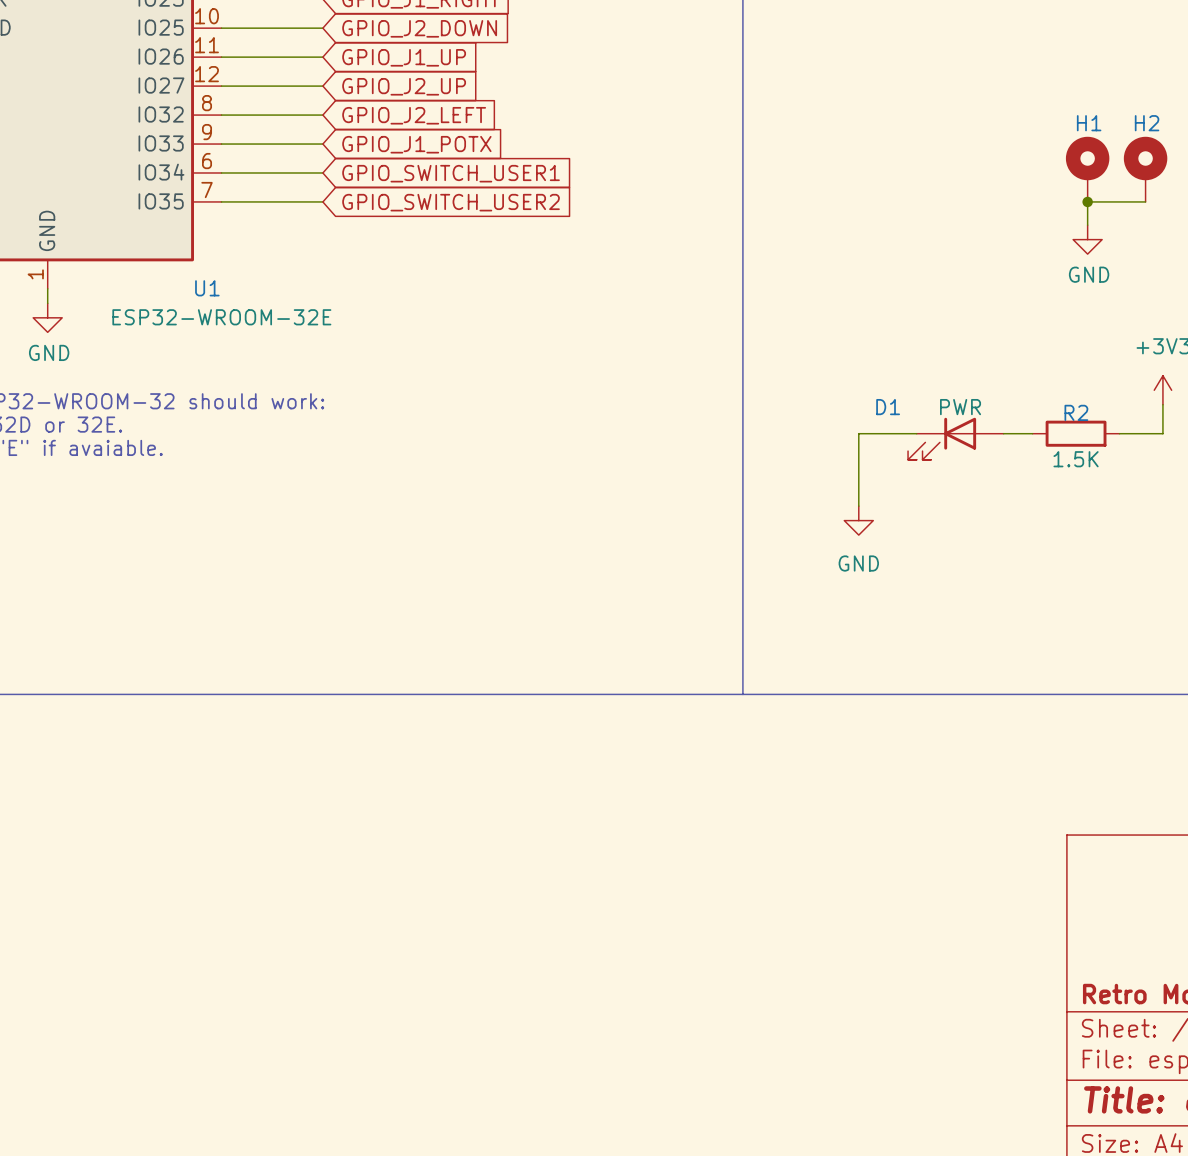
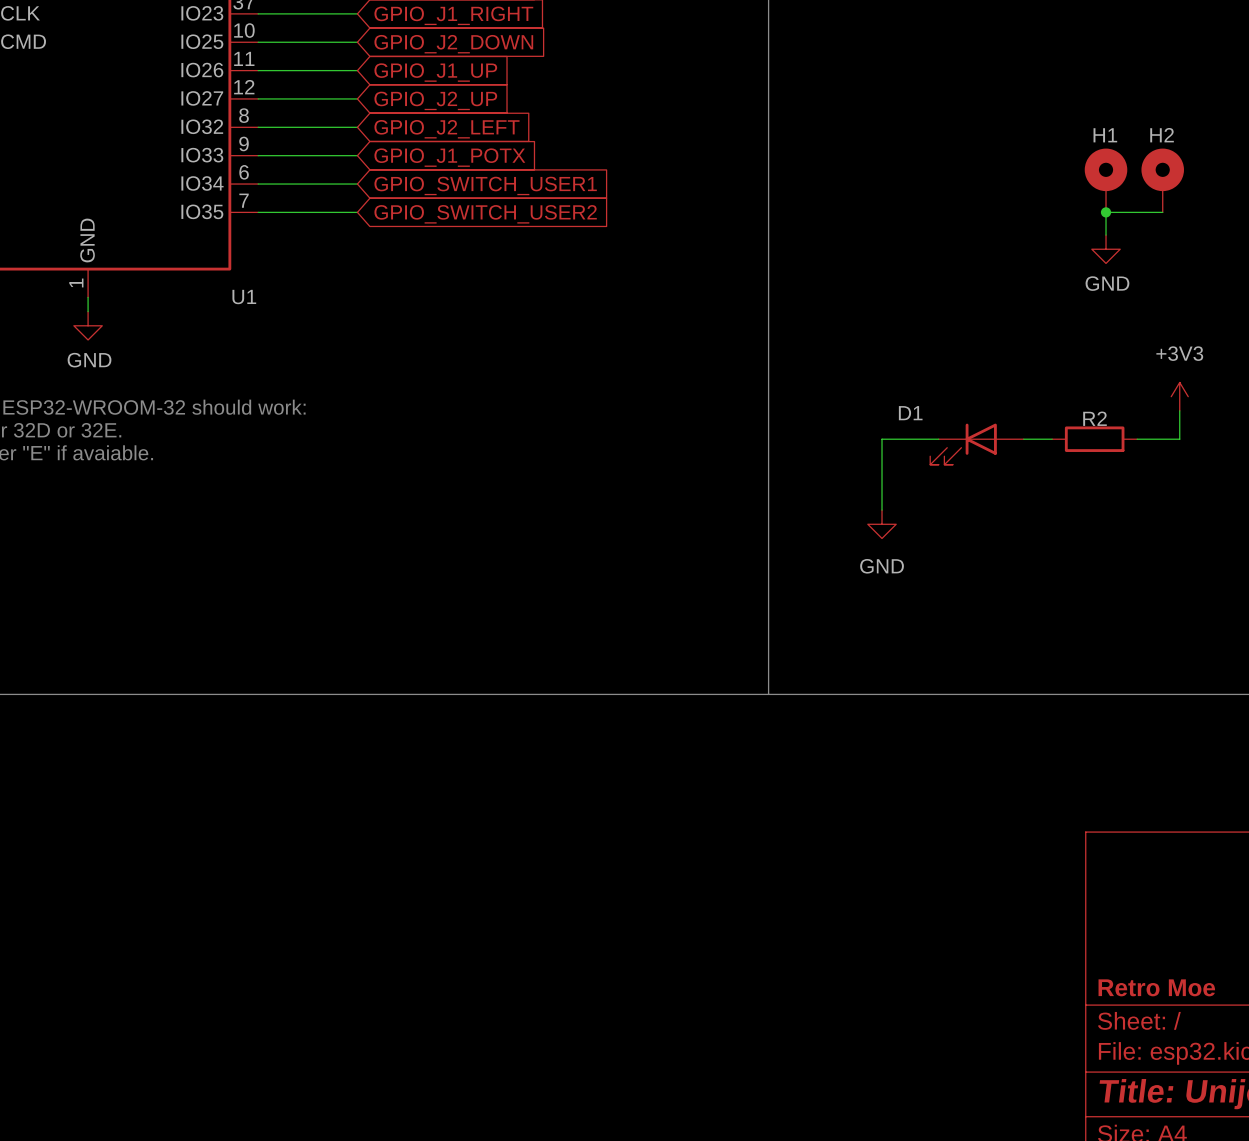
U1 value: ESP32-WROOM-32E (221, 317) -> none
D1 value: PWR (960, 407) -> none
R2 value: 1.5K (1076, 459) -> none

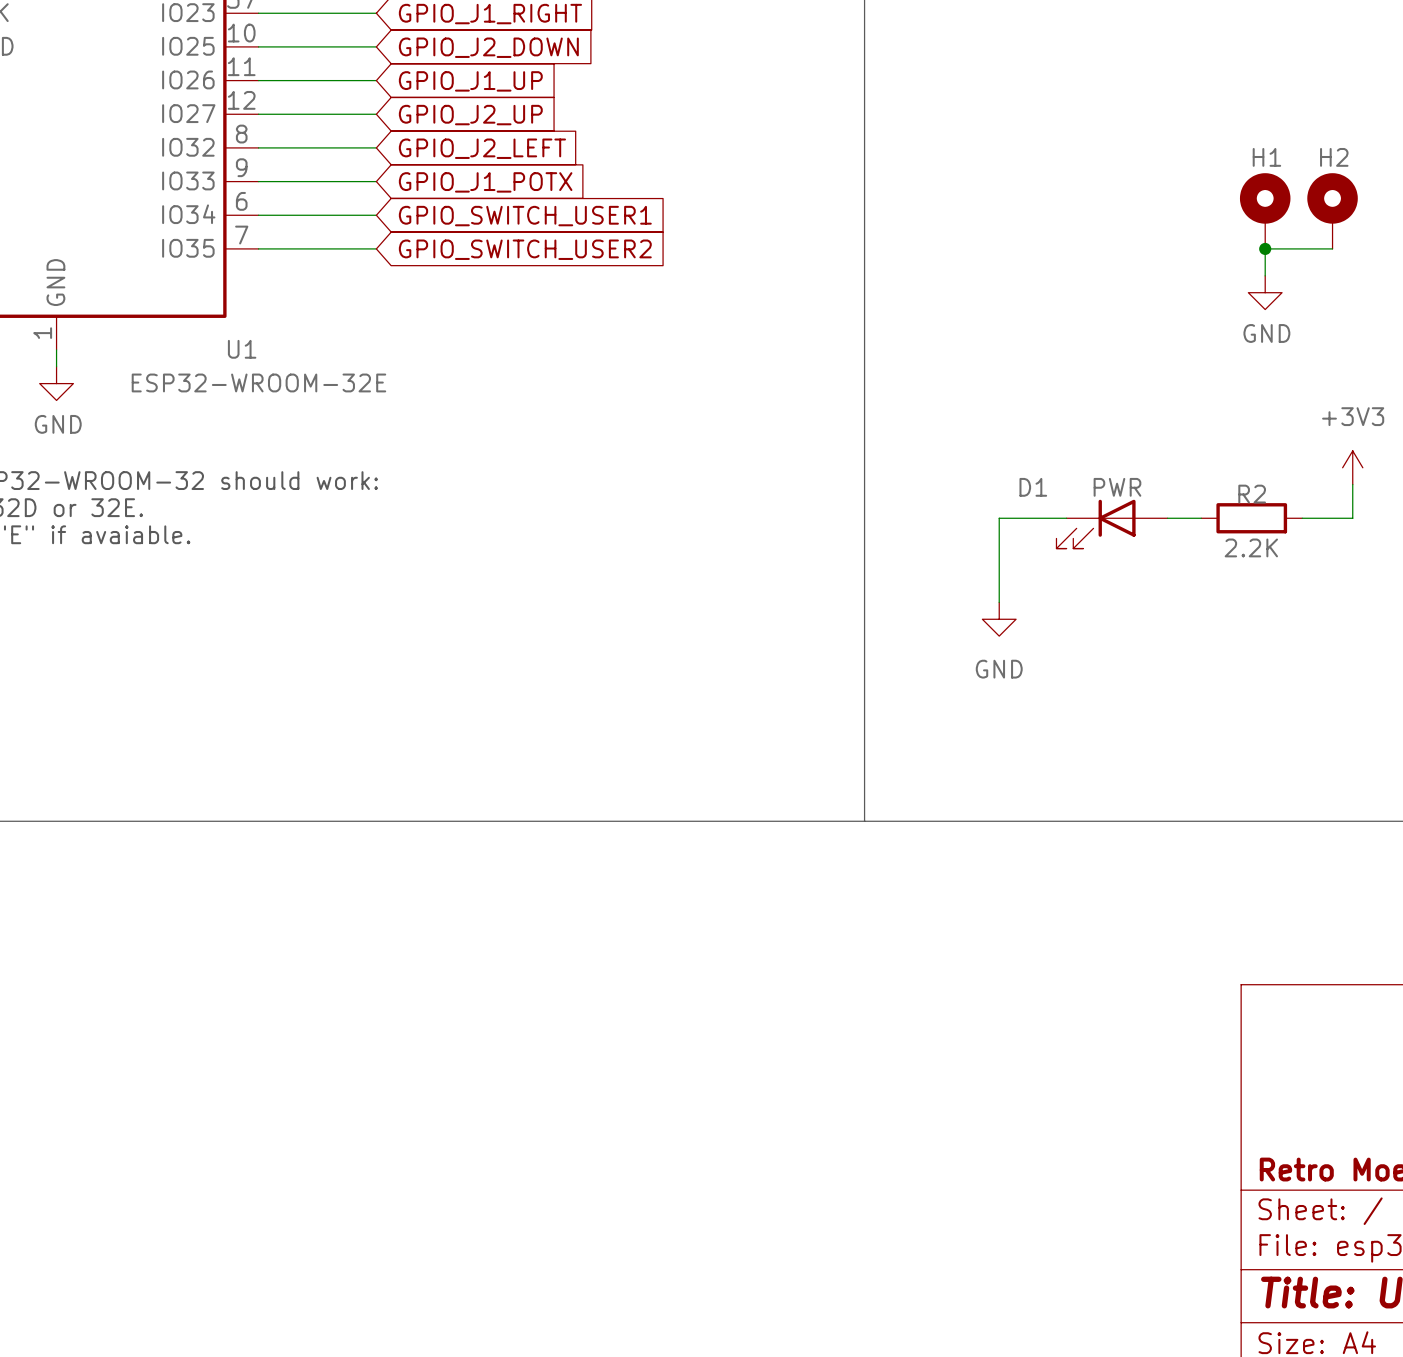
U1 value: none -> ESP32-WROOM-32E (258, 382)
D1 value: none -> PWR (1117, 487)
R2 value: none -> 2.2K (1251, 547)

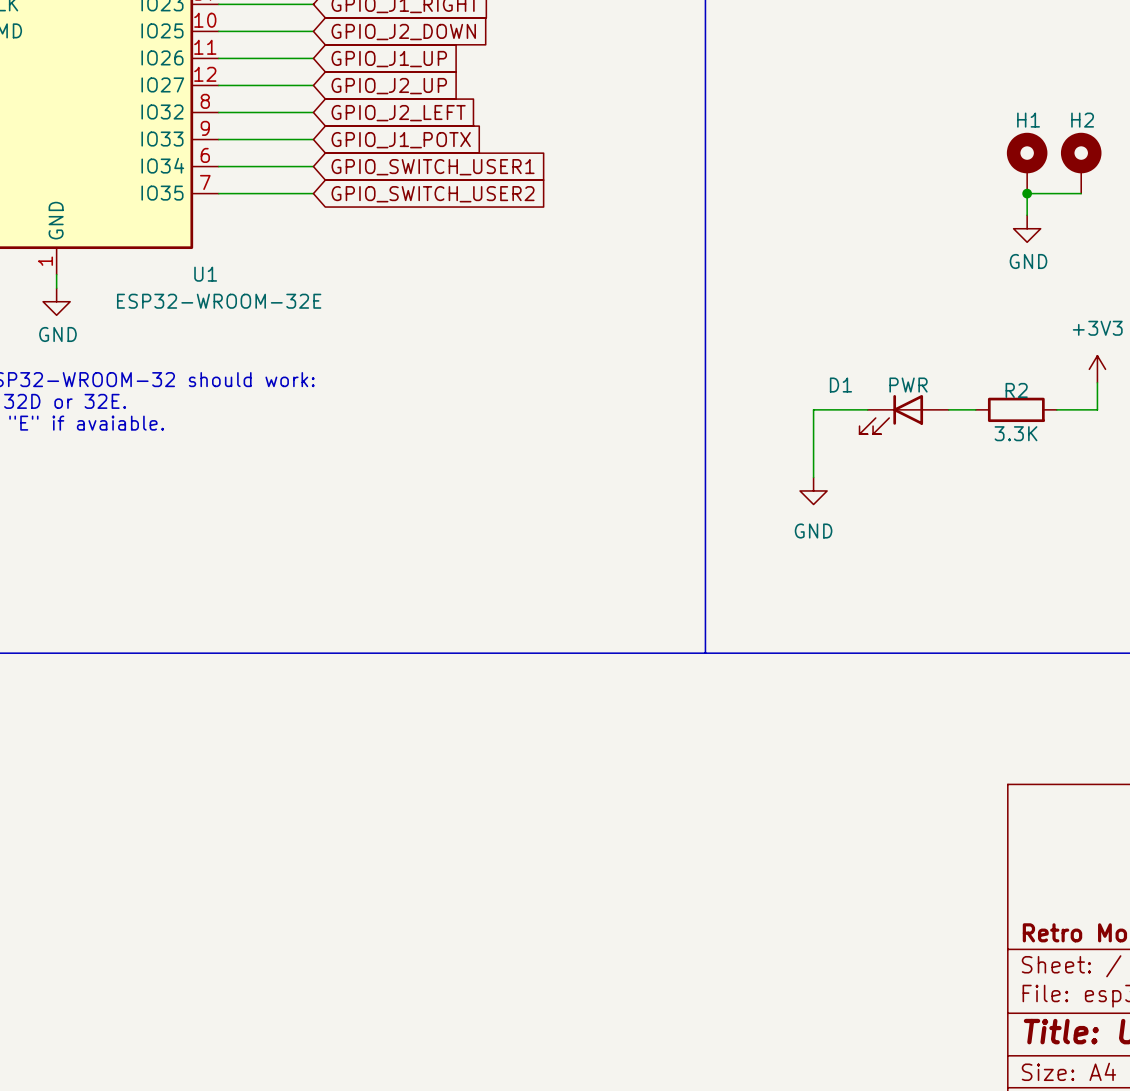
R2 value: 2.2K (1251, 547) -> 3.3K (1016, 433)

